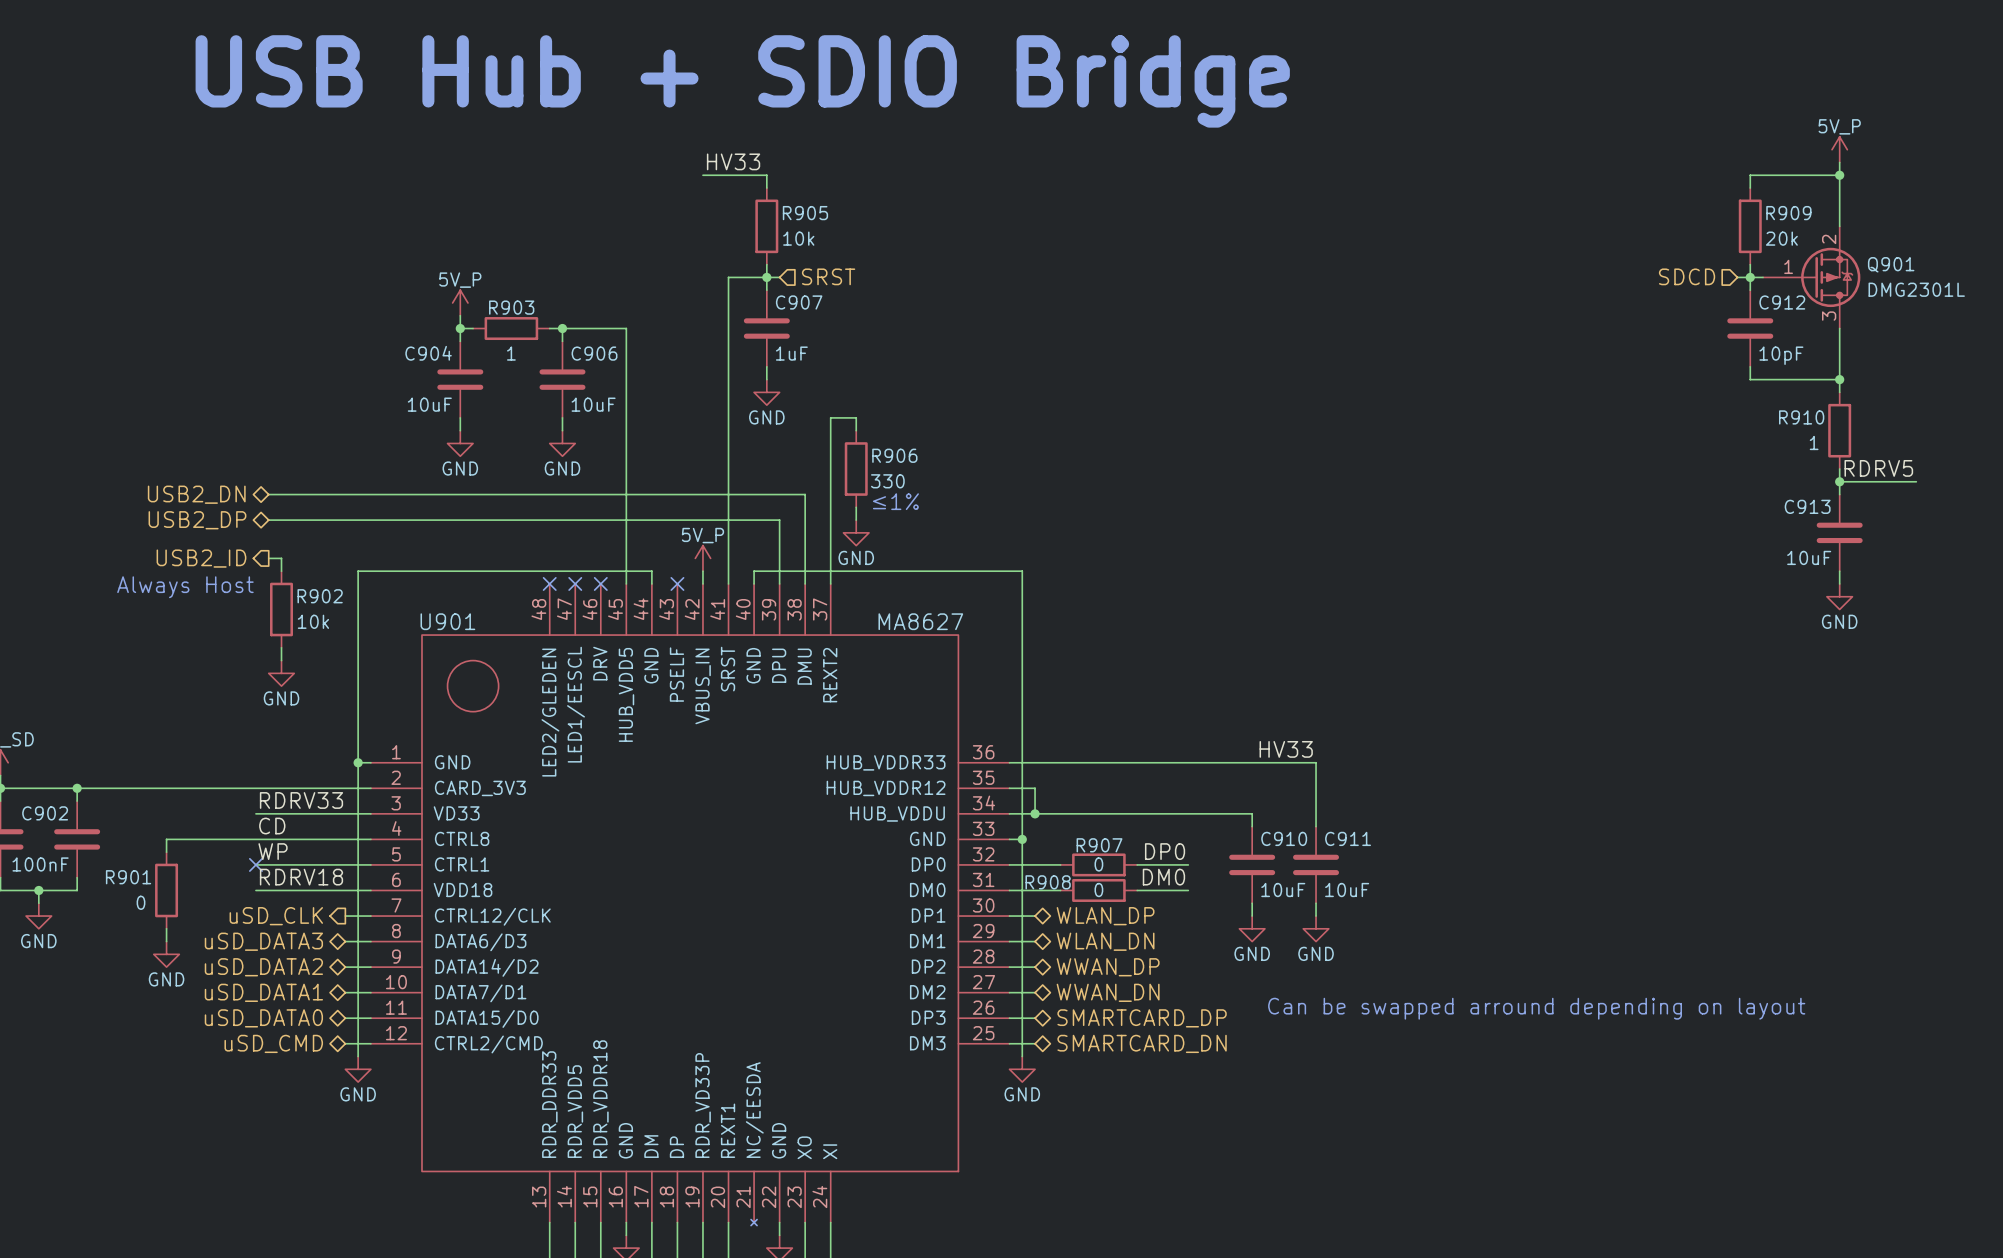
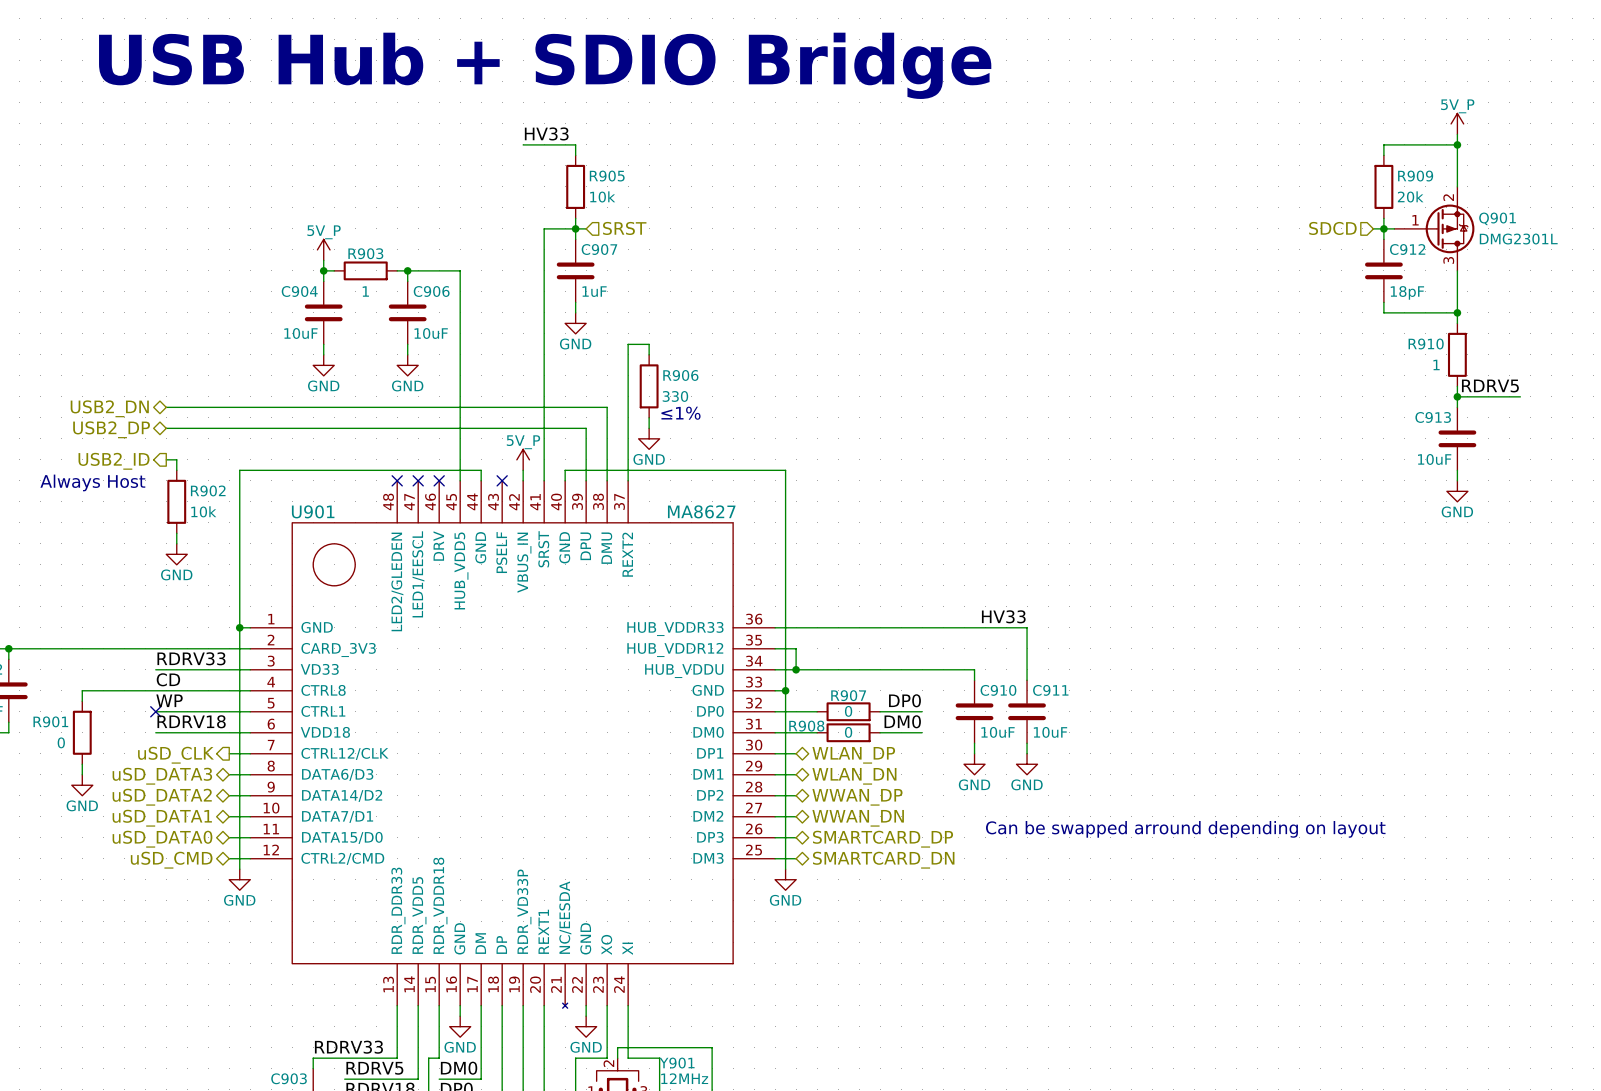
C912 value: 10pF (1781, 355) -> 18pF (1407, 292)

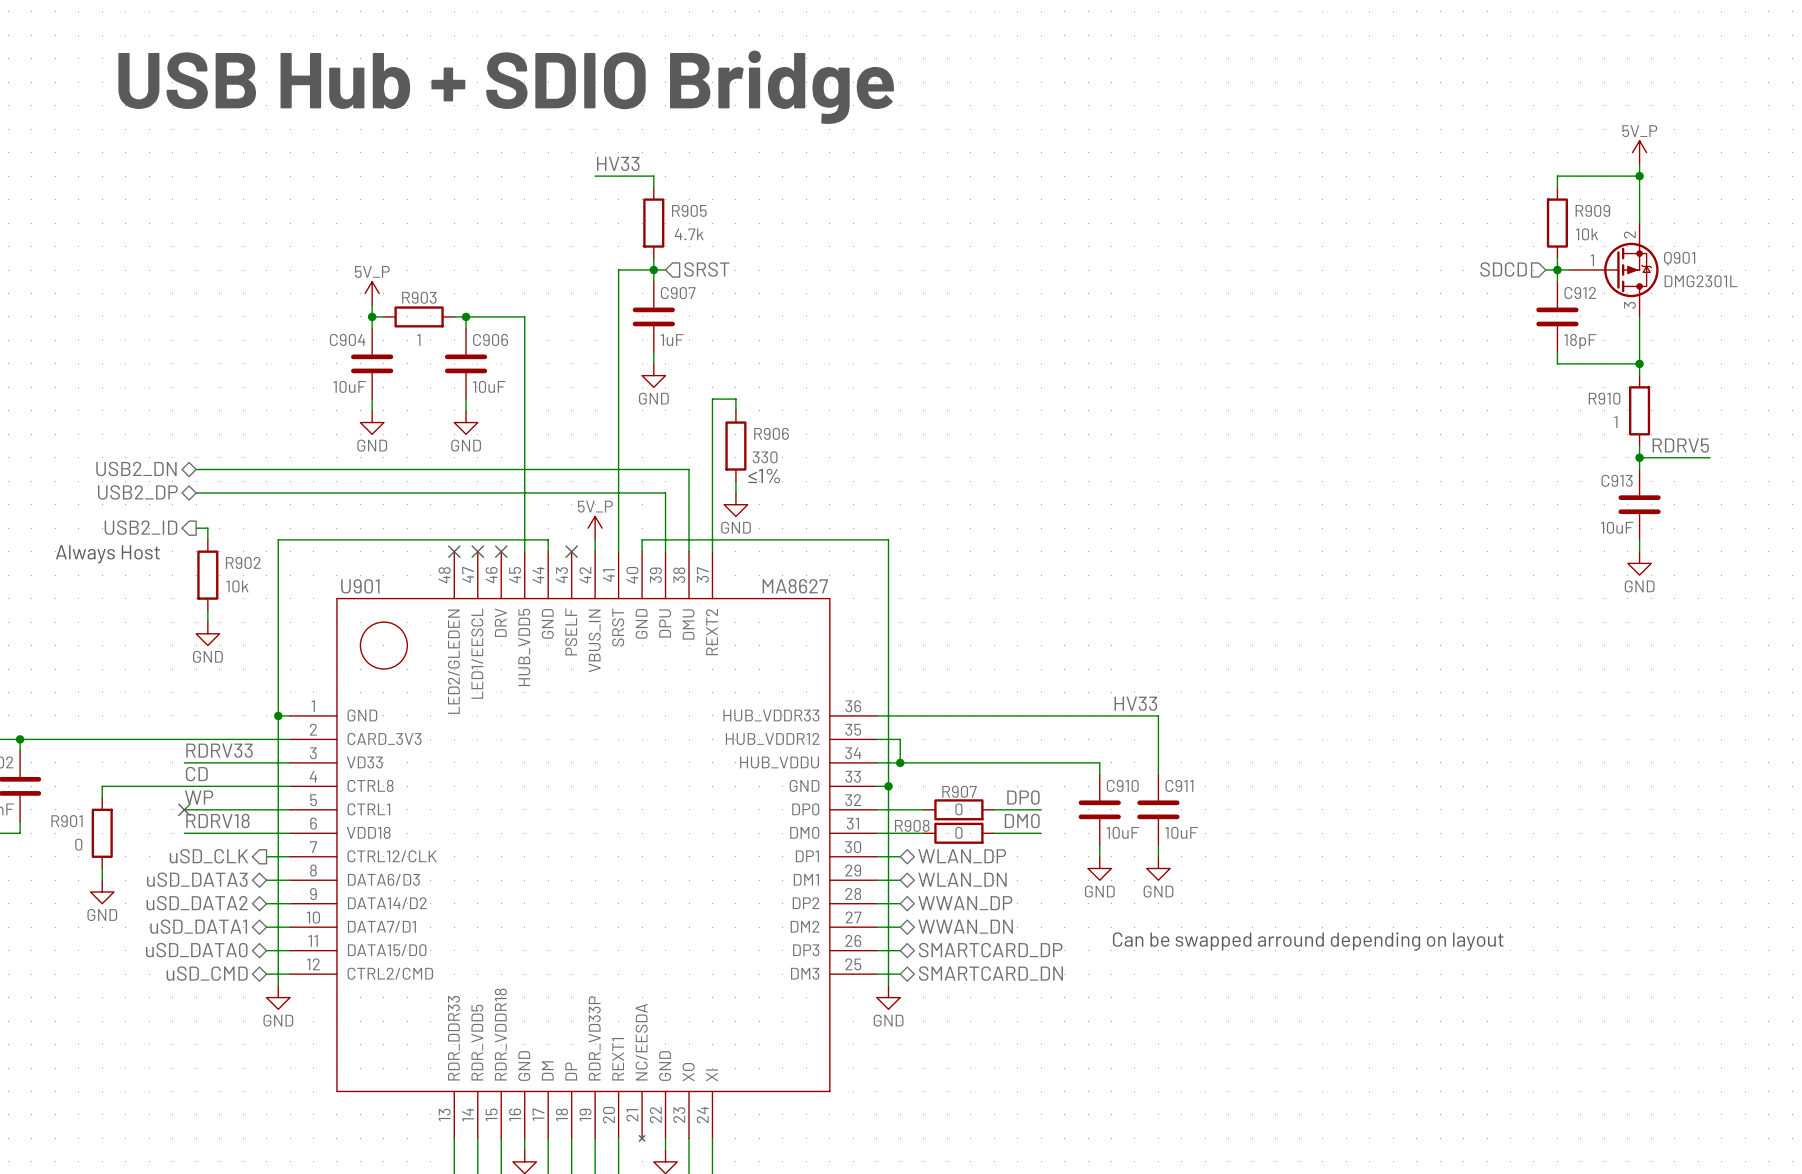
R905 value: 10k (602, 196) -> 4.7k (689, 234)
R909 value: 20k (1410, 196) -> 10k (1586, 234)

